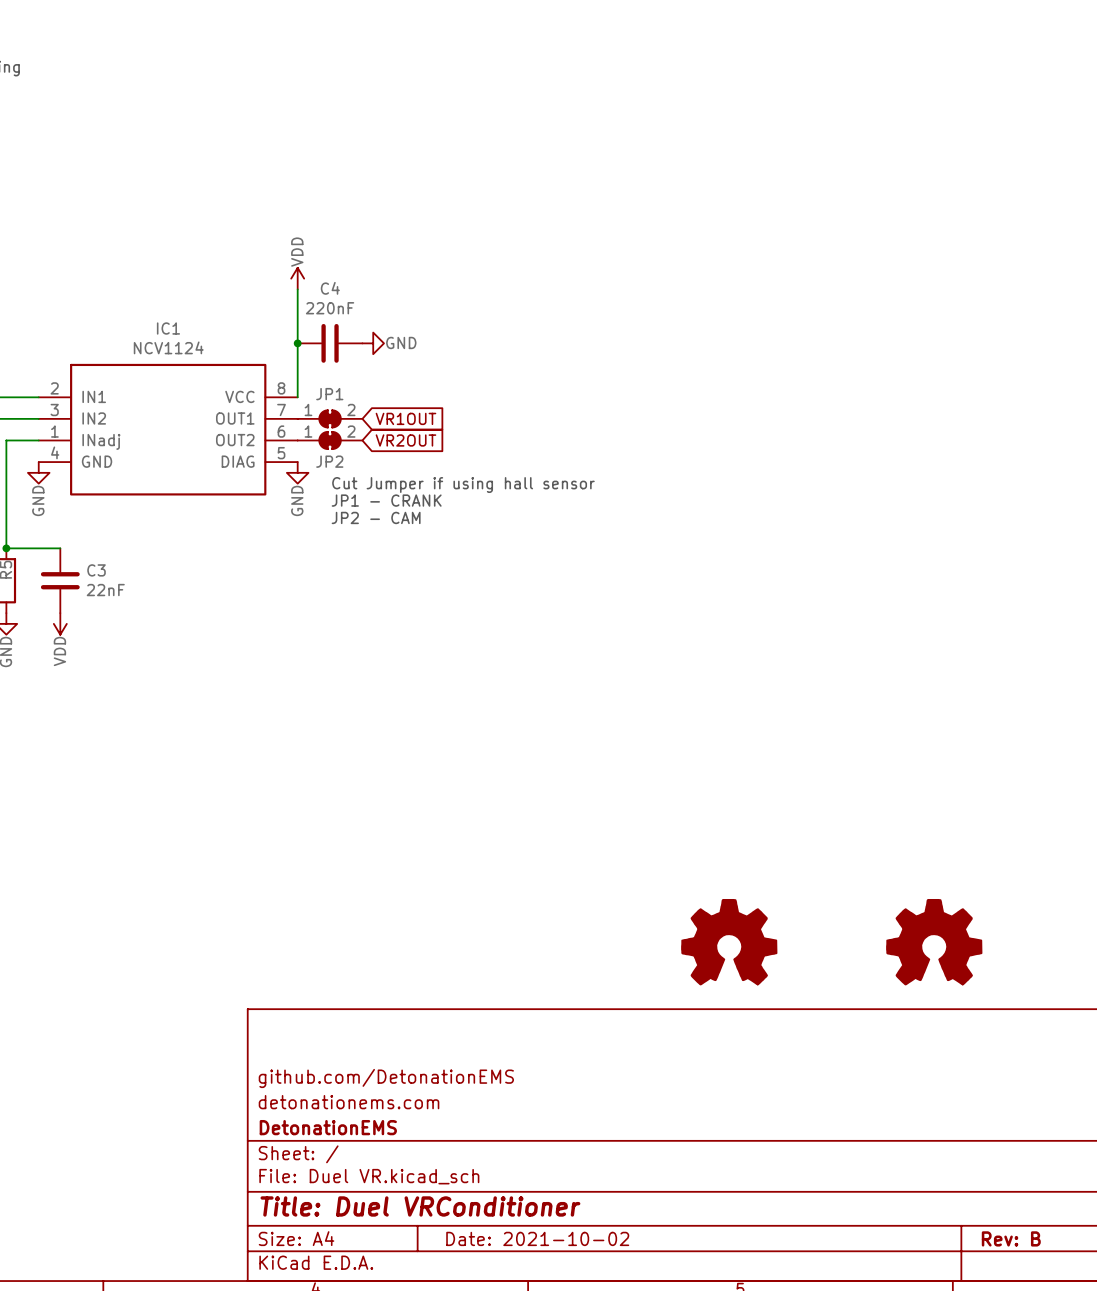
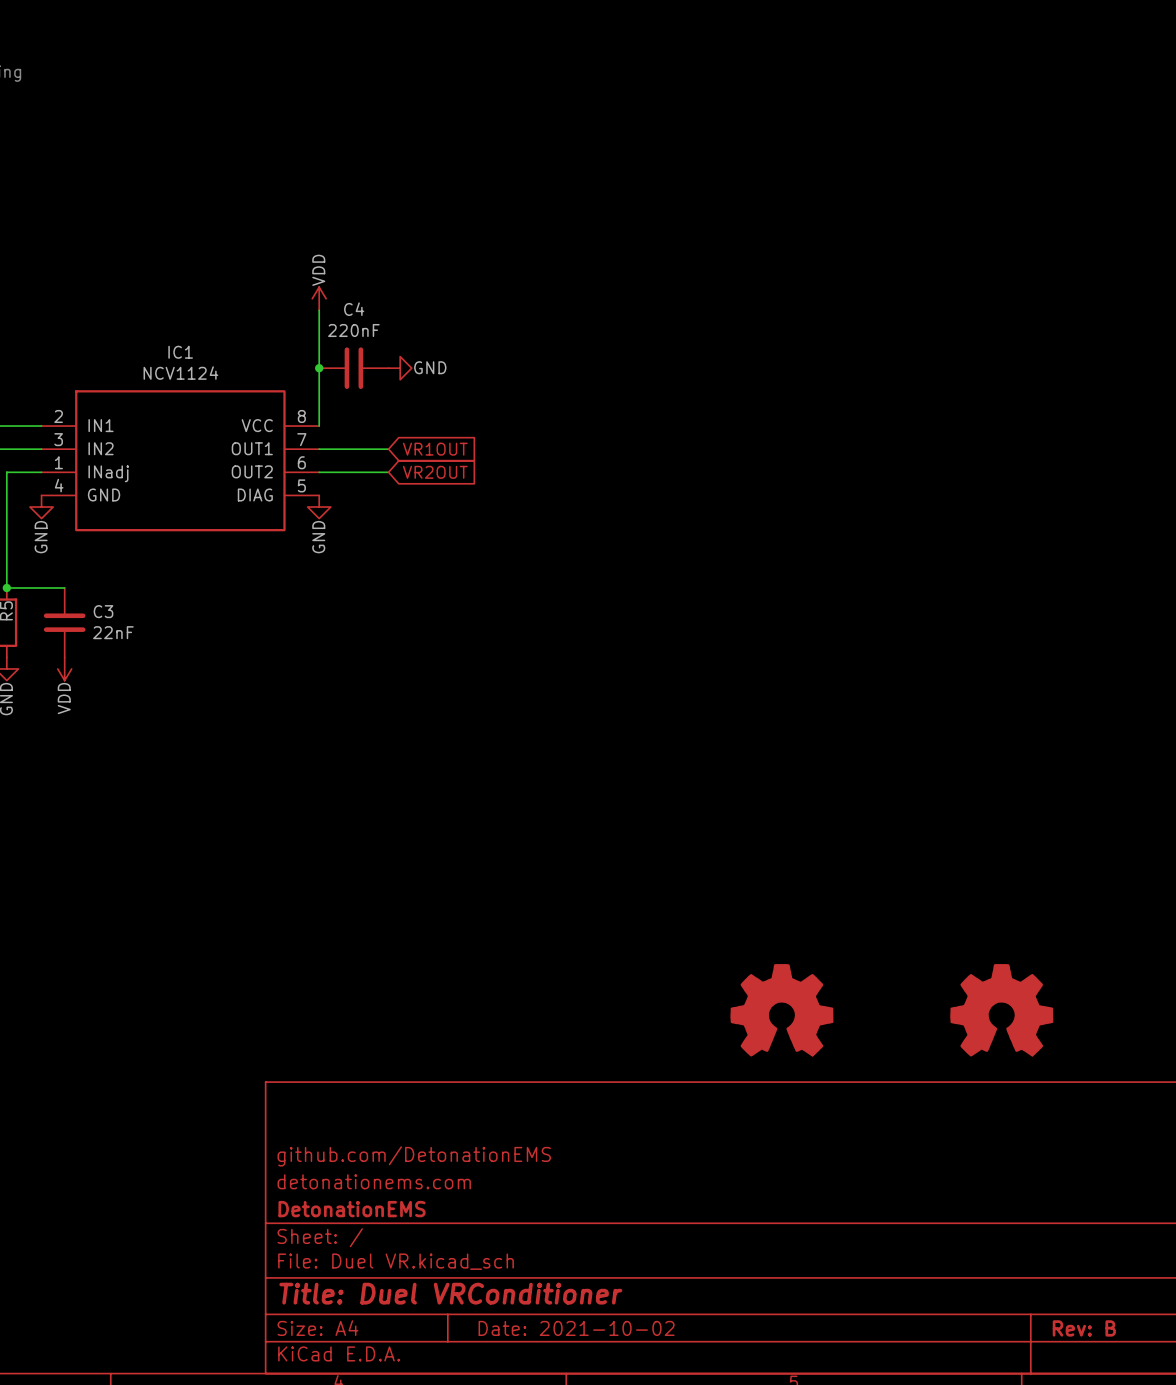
JP1: (330, 418) -> none
JP2: (330, 440) -> none
text: Cut Jumper if using hall sensor (463, 485) -> none
text: JP1 - CRANK (386, 500) -> none
text: JP2 - CAM (376, 517) -> none

